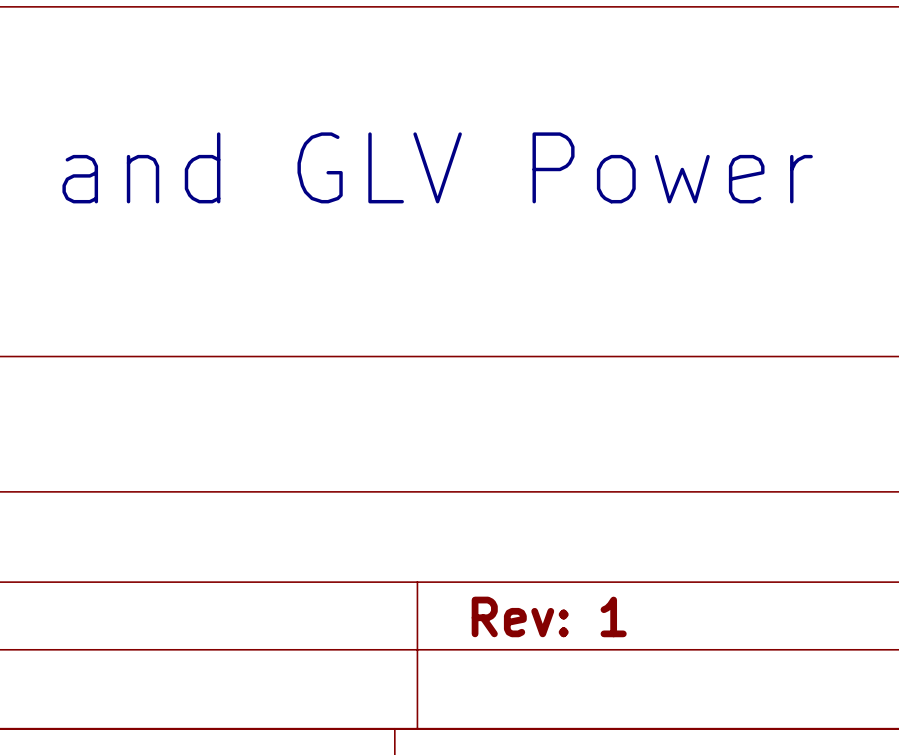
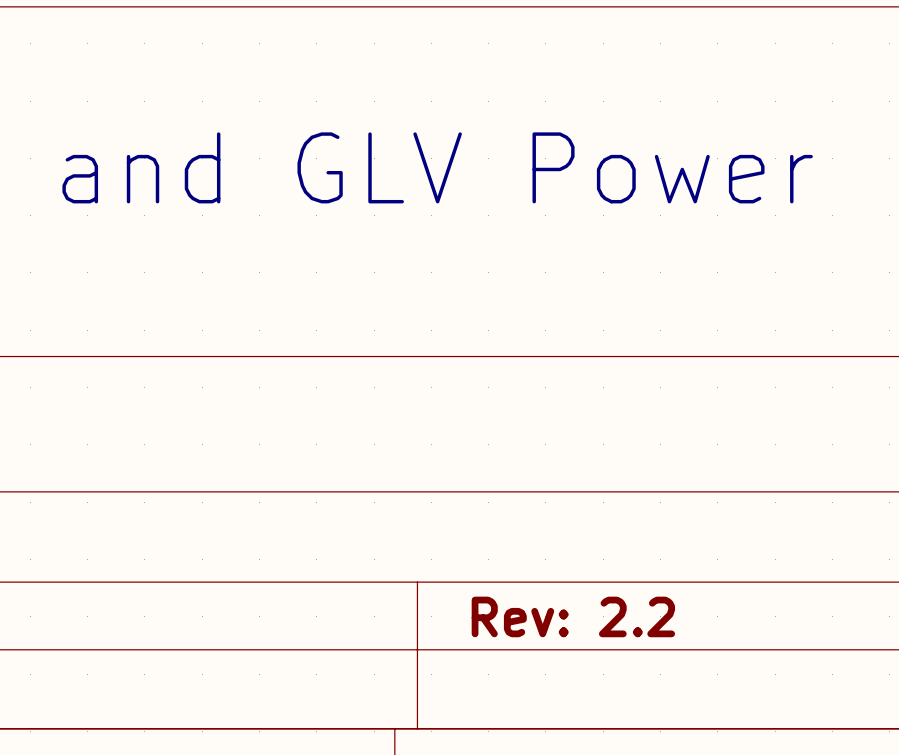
title block: Rev: 1 (549, 616) -> Rev: 2.2 (573, 616)

